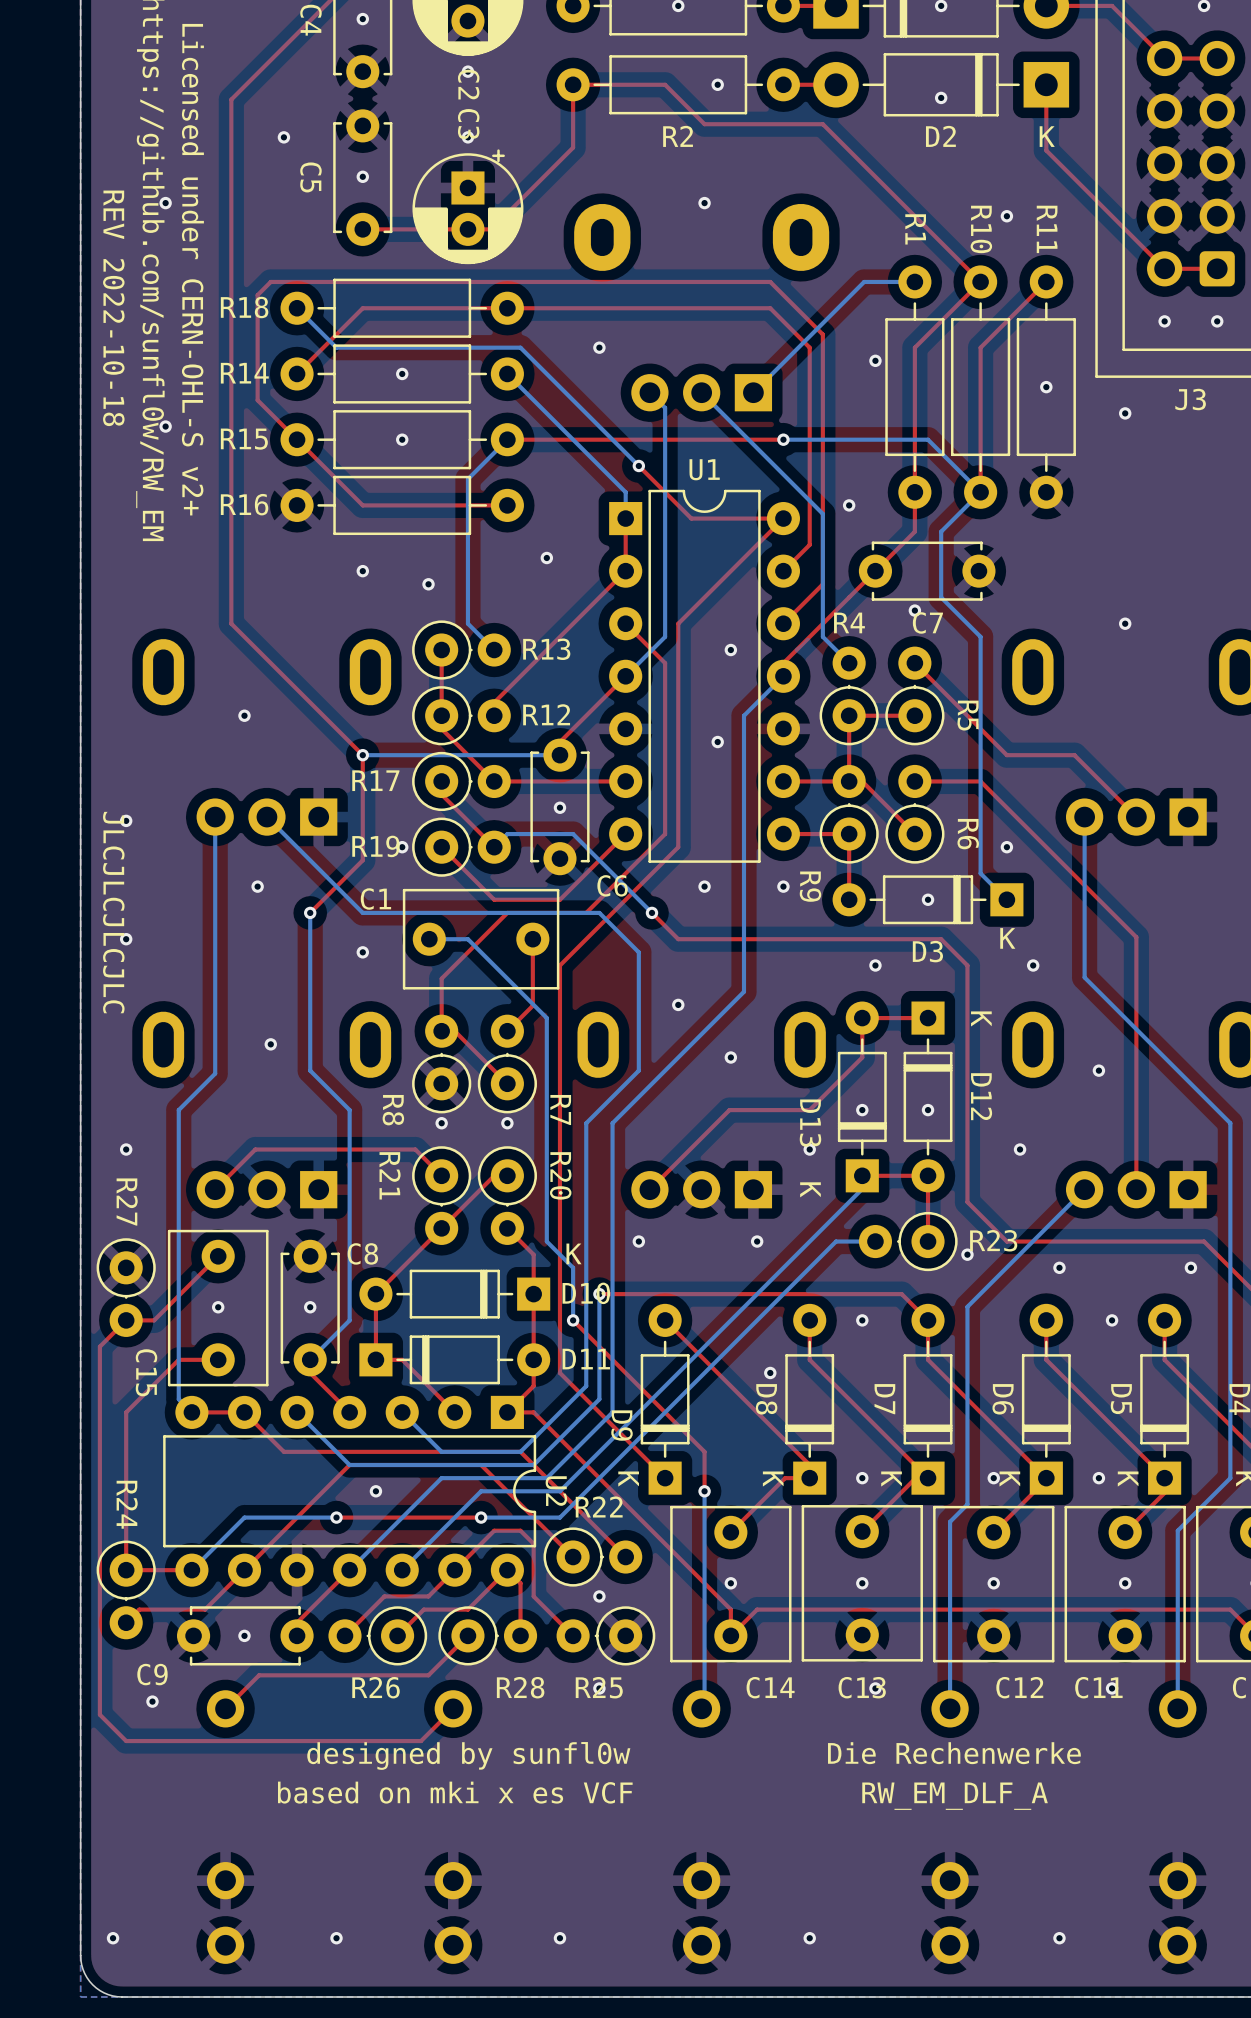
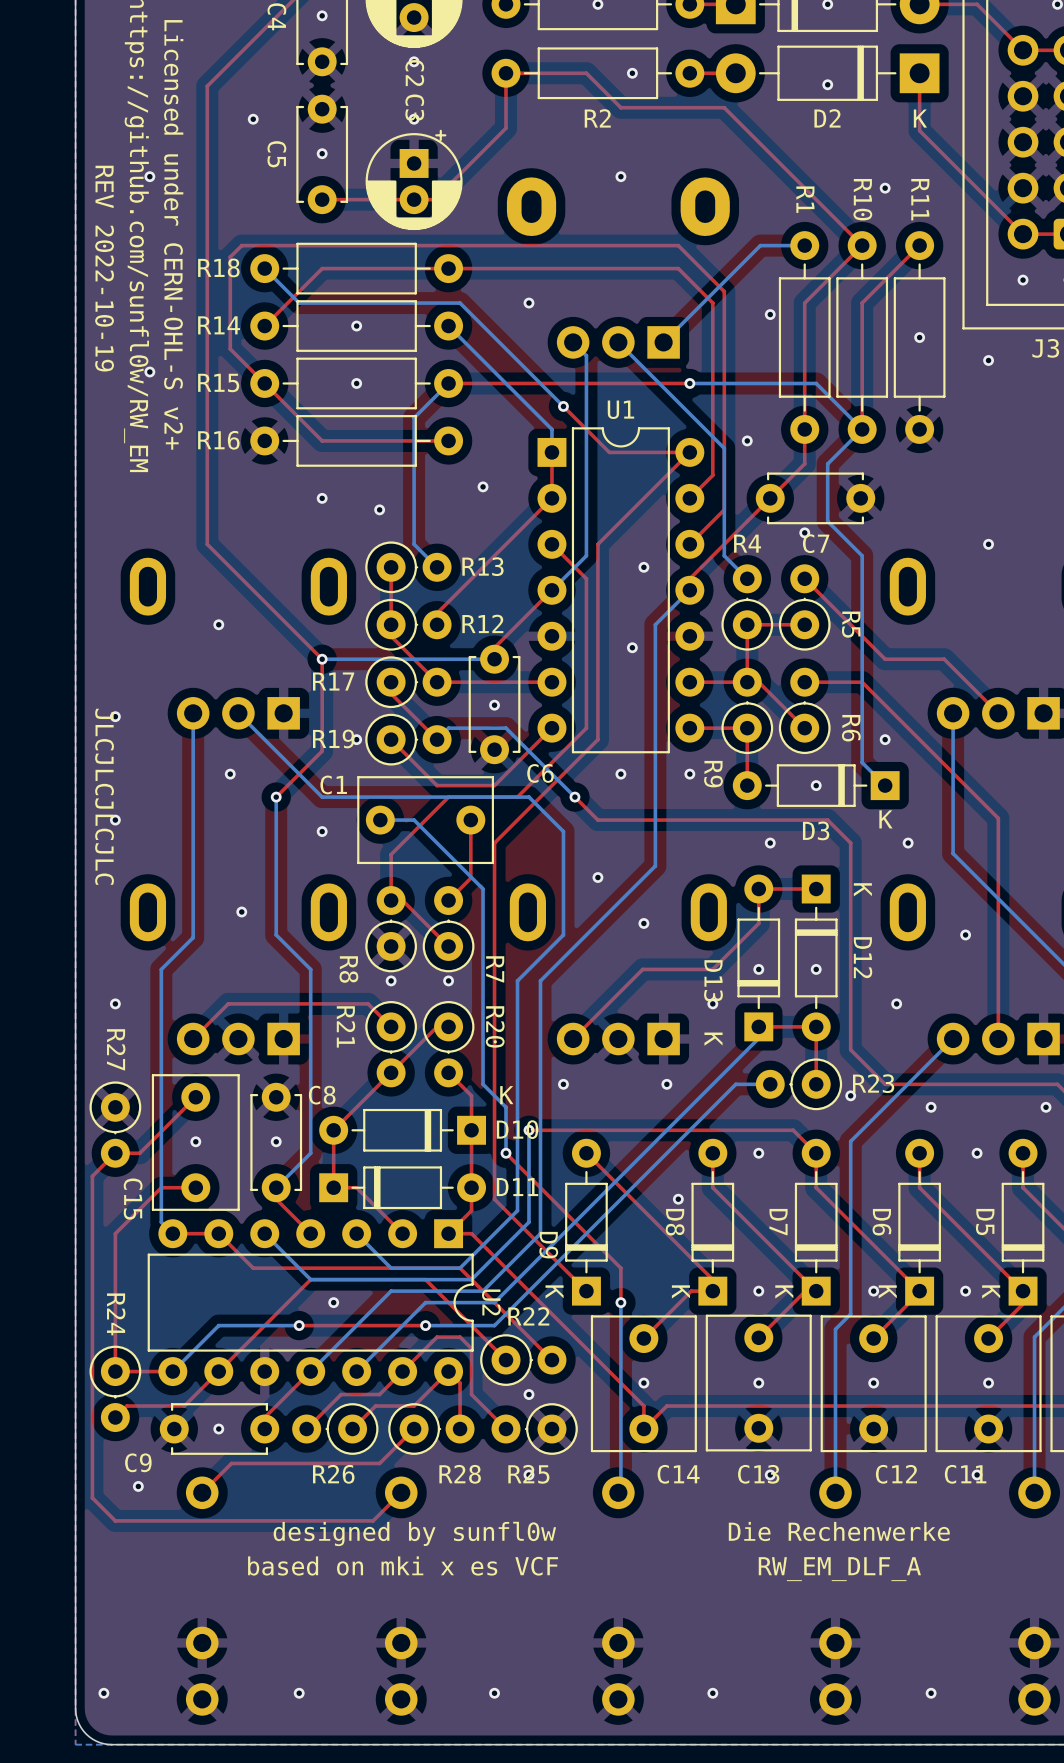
text: REV 2022-10-18 (113, 308) -> REV 2022-10-19 (104, 268)

